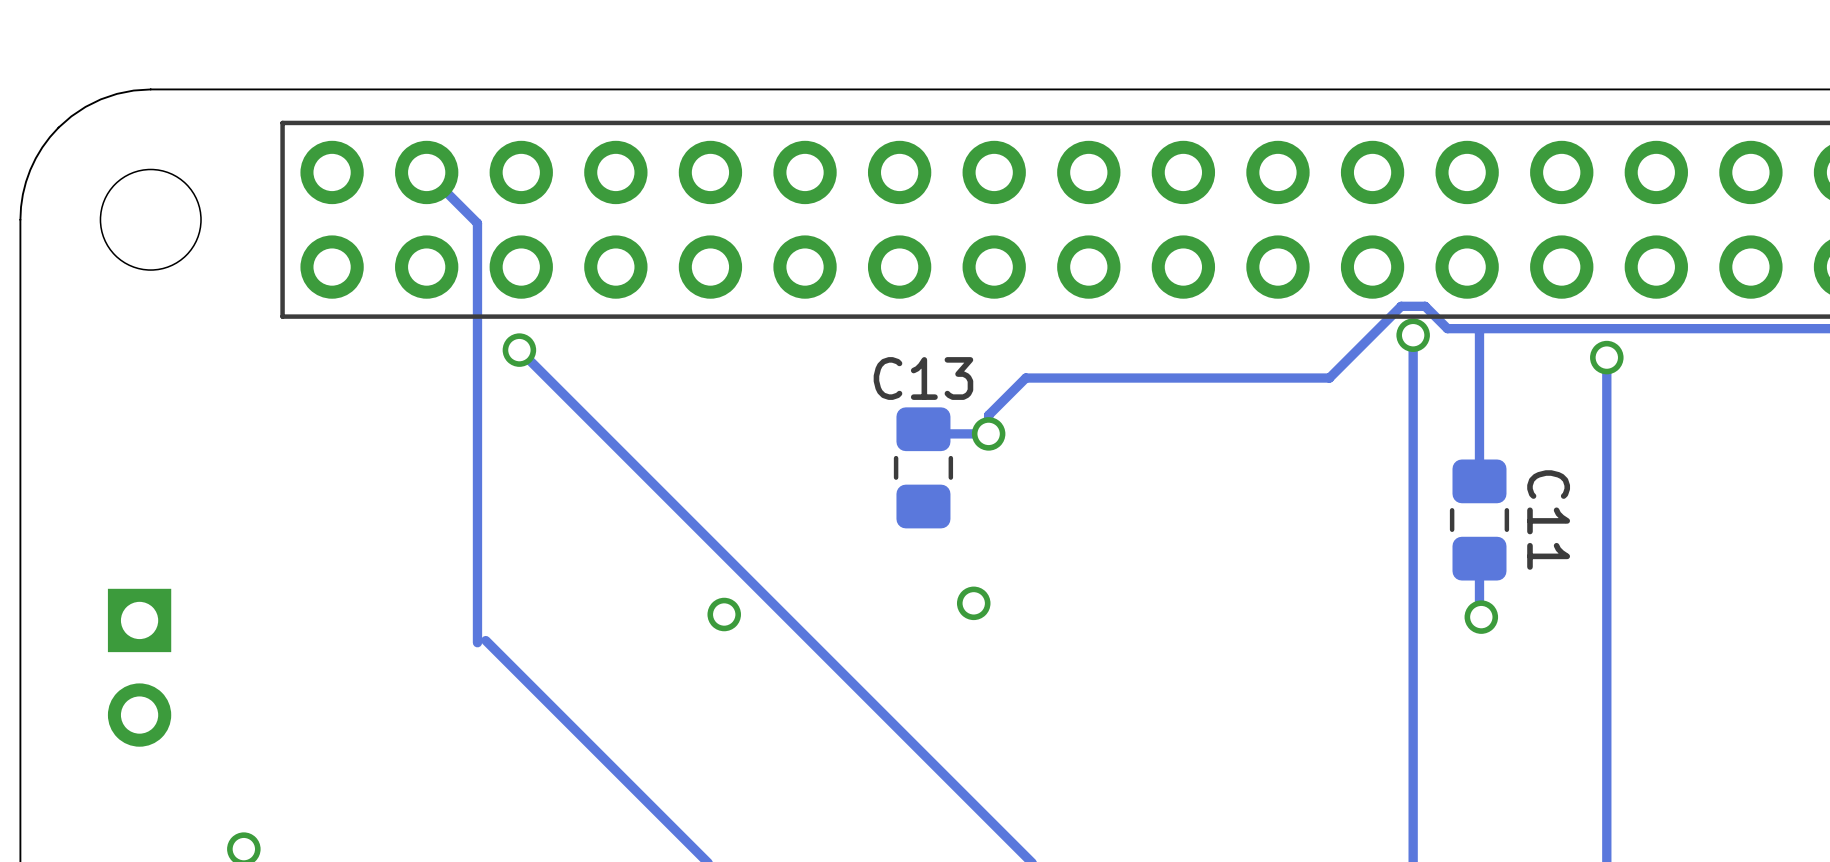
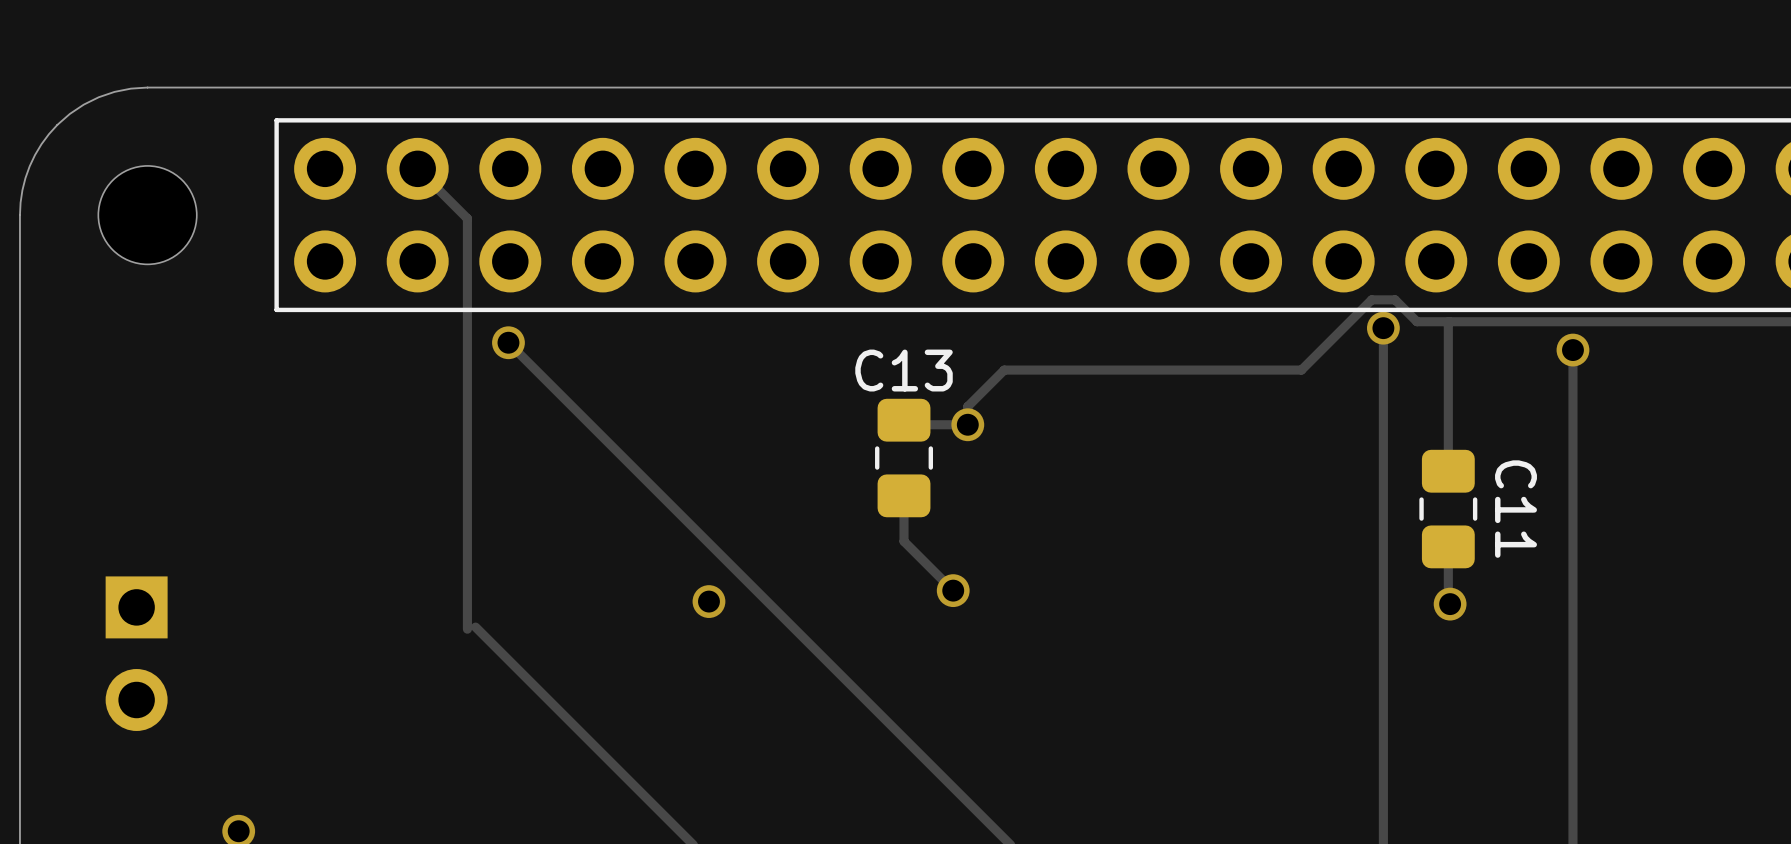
track: none -> (904, 503) (904, 541) (953, 590)

